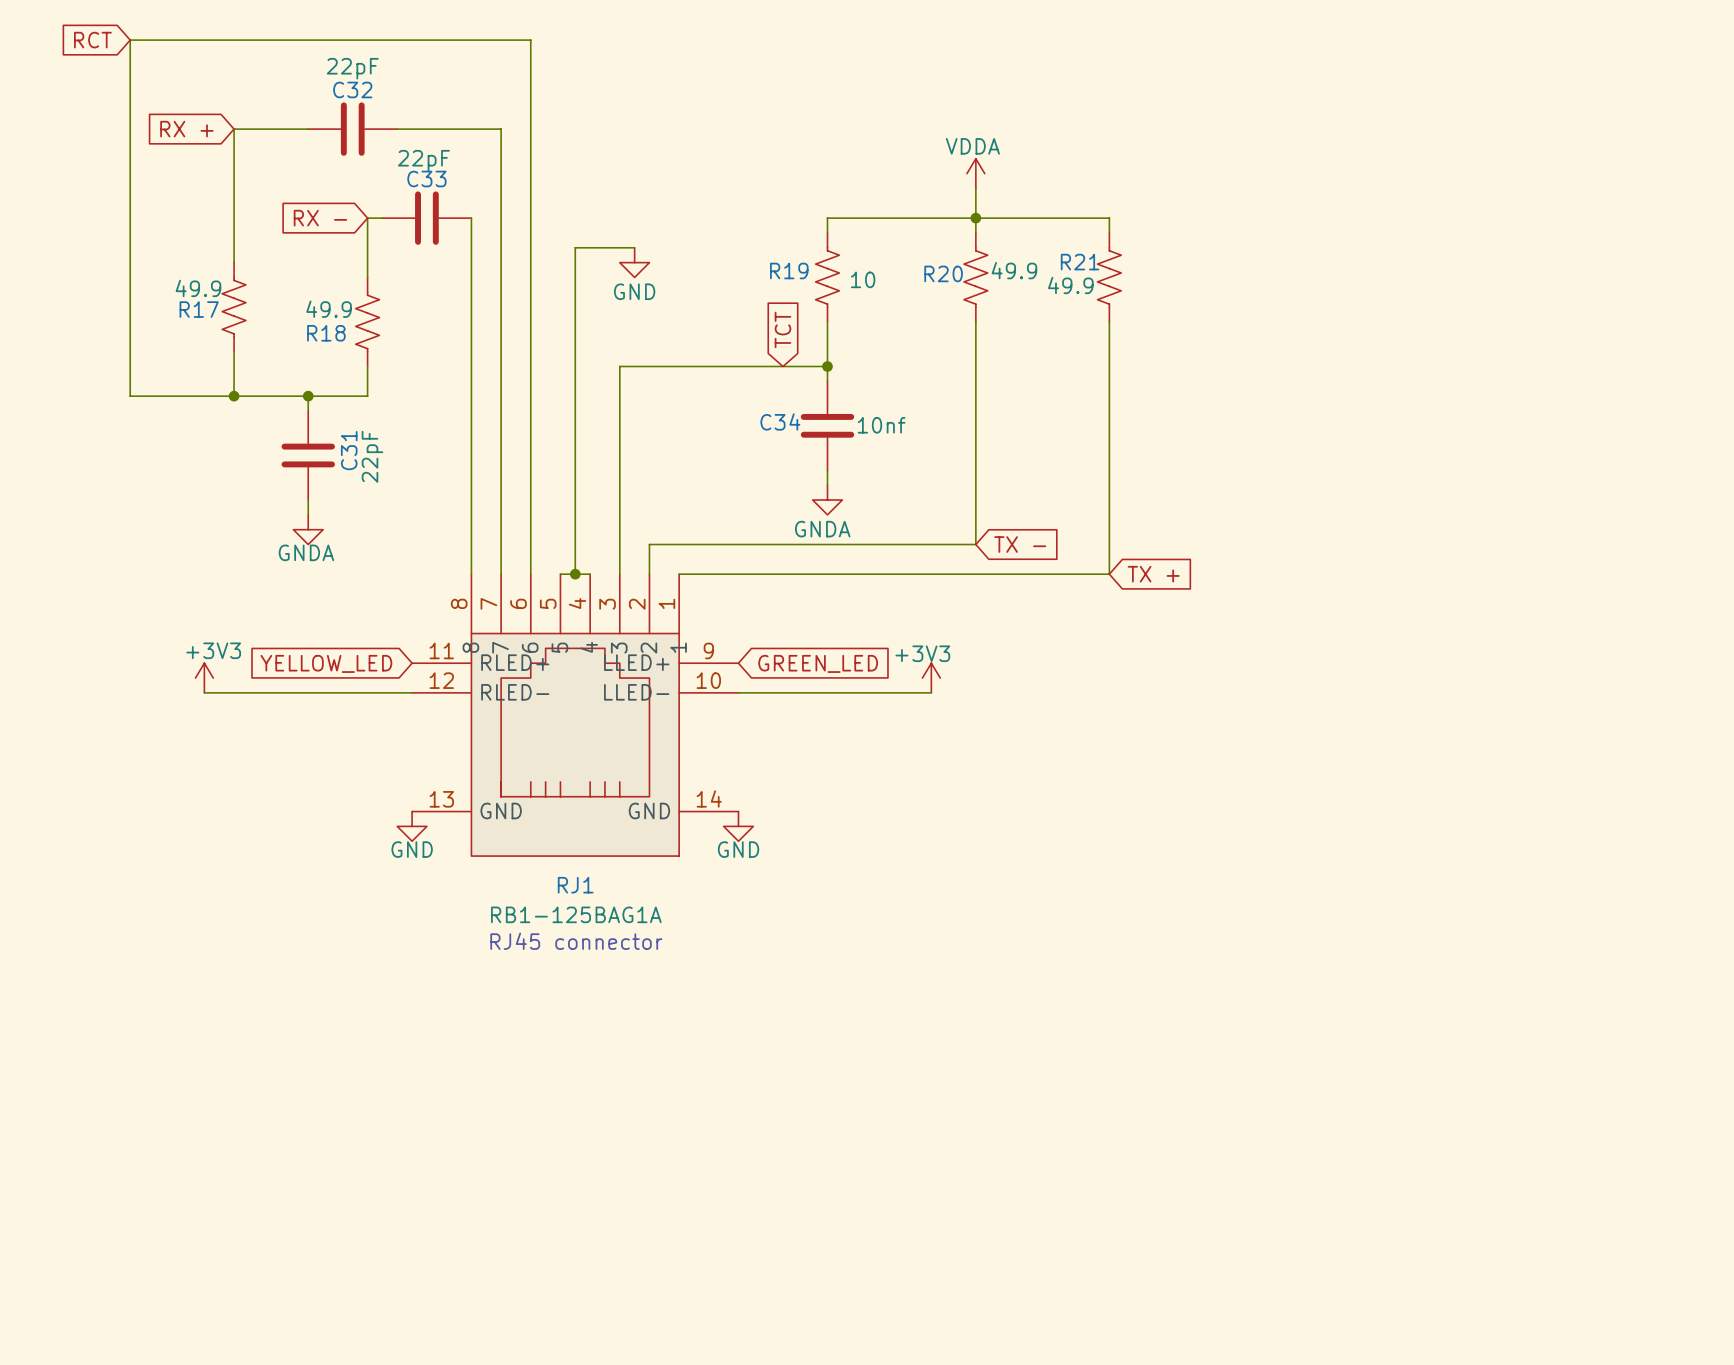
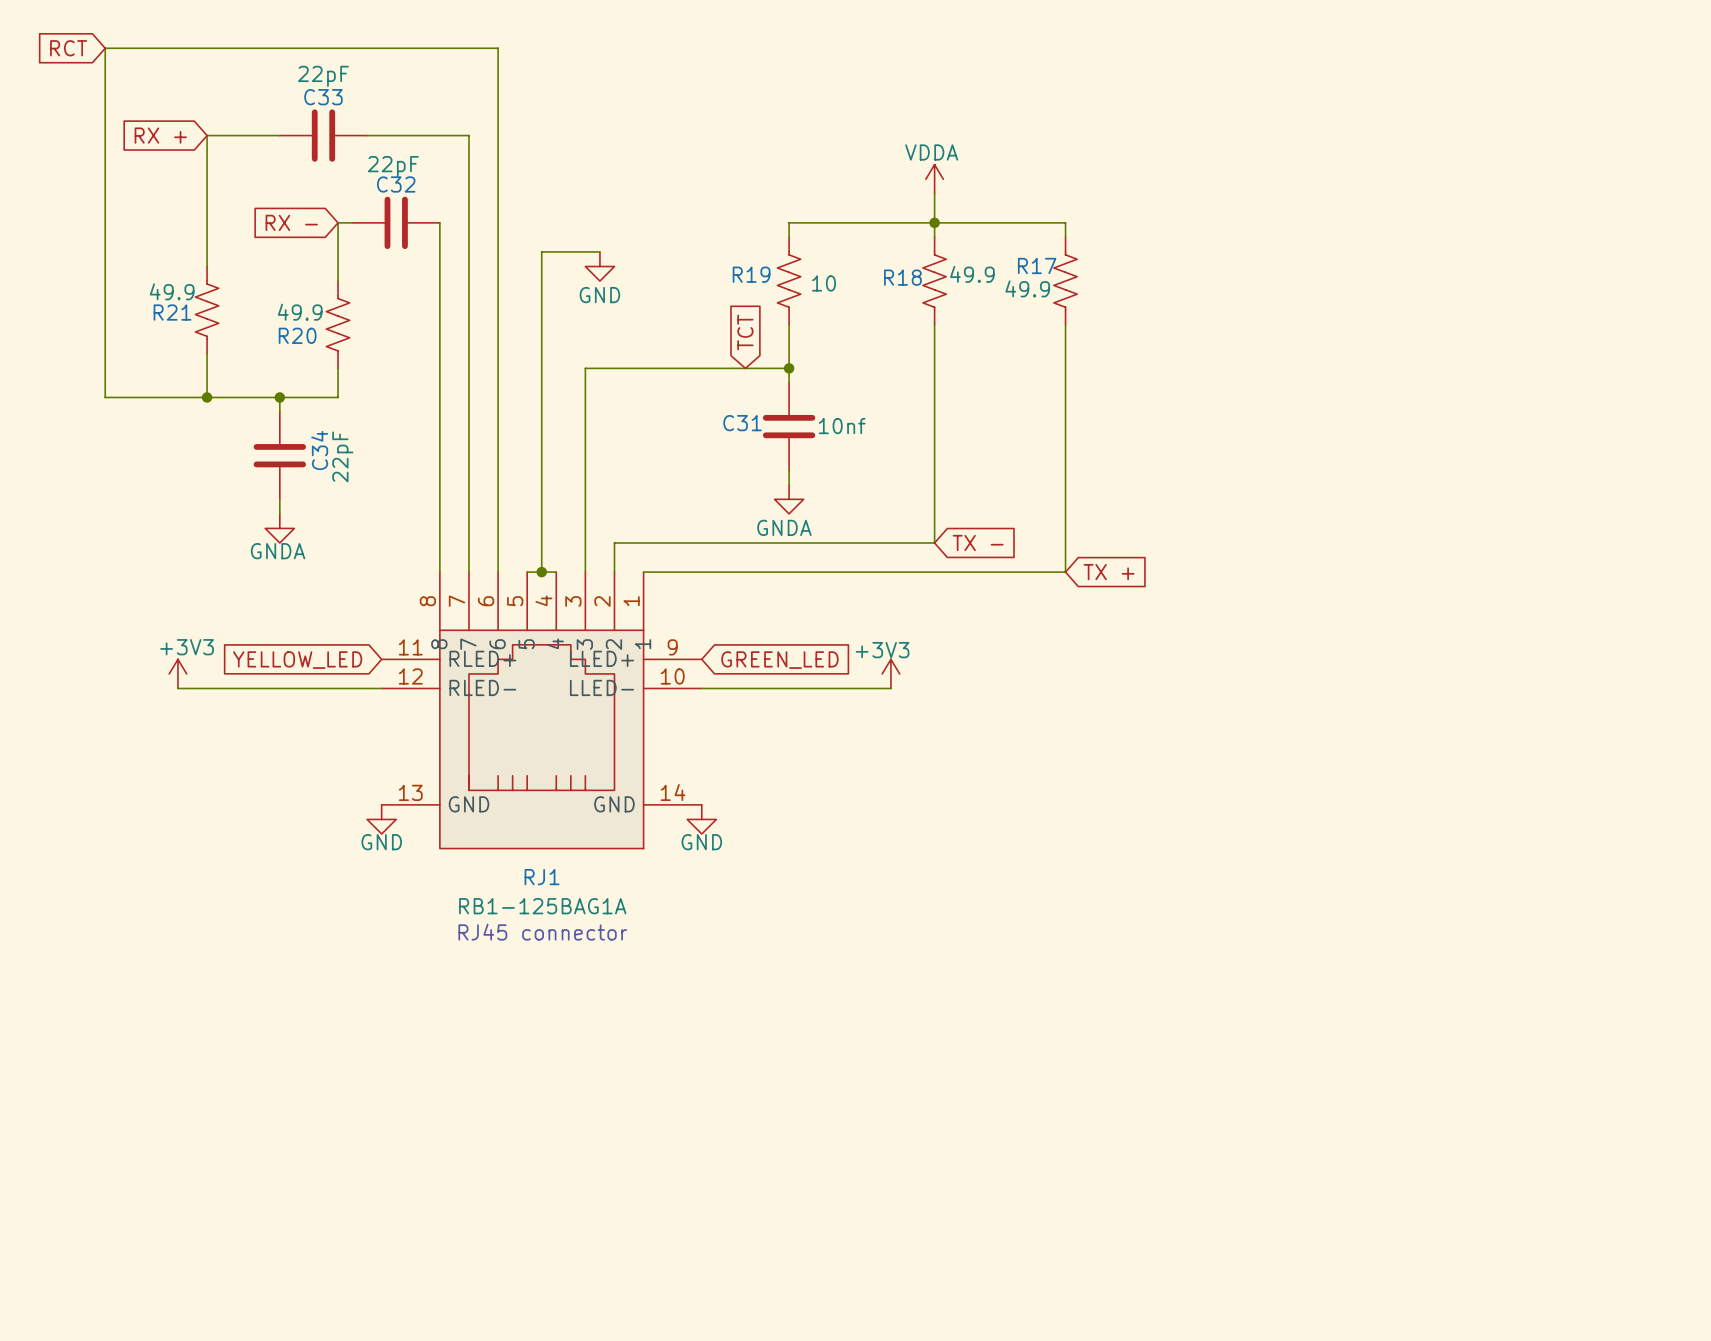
C32 name: C32 (352, 89) -> C33 (323, 97)
C33 name: C33 (426, 179) -> C32 (396, 184)
R21 name: R21 (1080, 262) -> R17 (1037, 265)
R20 name: R20 (943, 273) -> R18 (902, 277)
R17 name: R17 (199, 309) -> R21 (172, 312)
R18 name: R18 (326, 333) -> R20 (297, 335)
C34 name: C34 (780, 421) -> C31 (742, 423)
C31 name: C31 (349, 450) -> C34 (319, 450)

